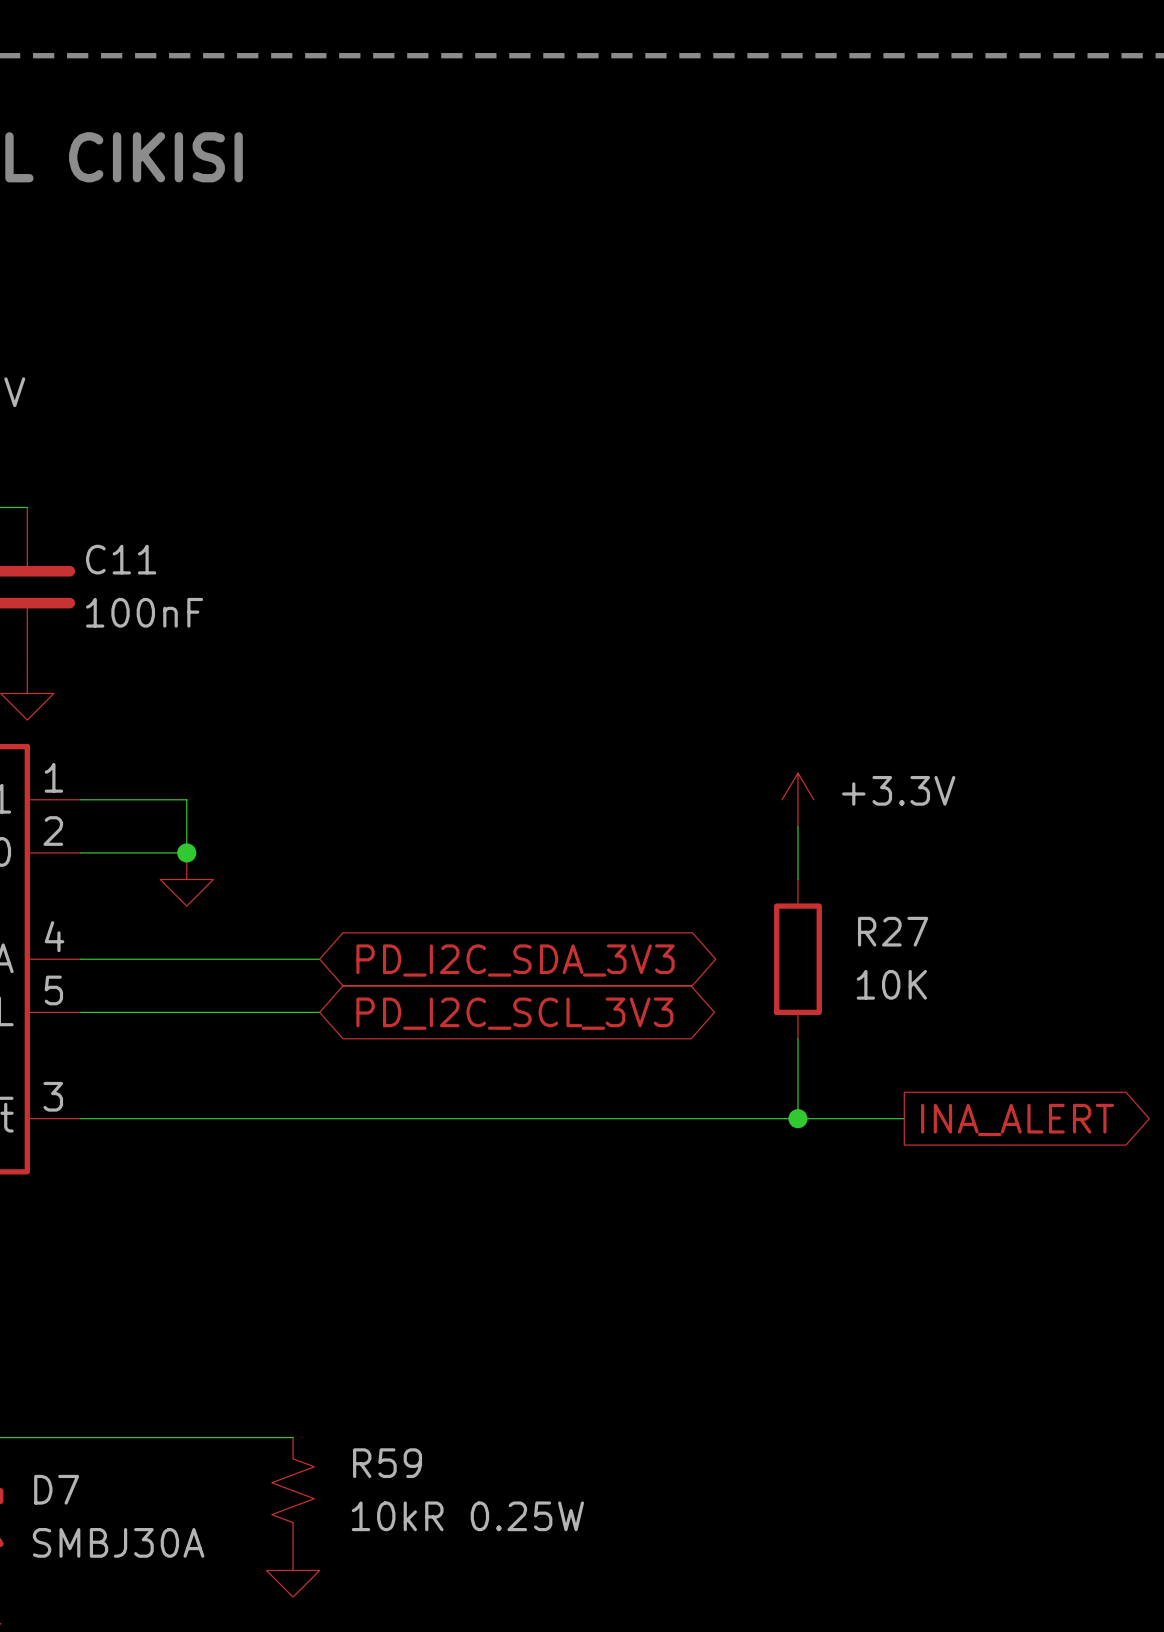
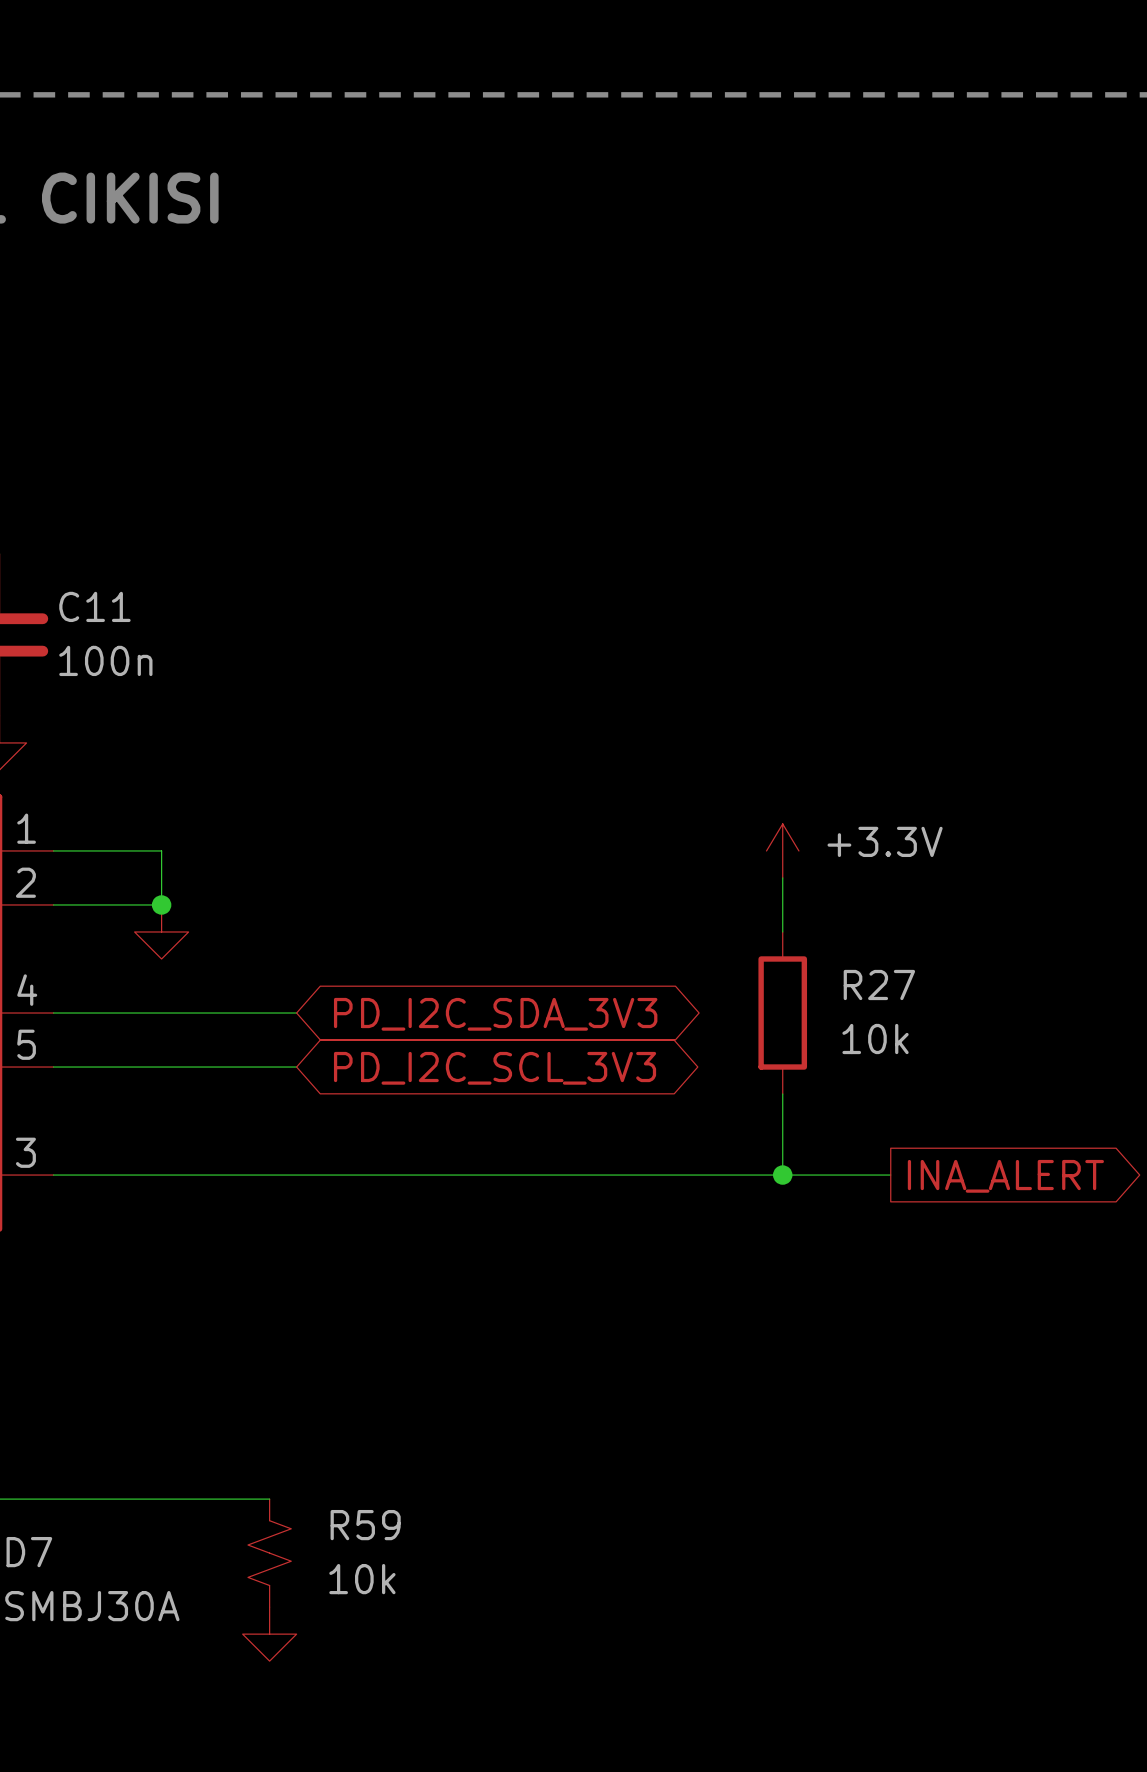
C11 value: 100nF (144, 612) -> 100n (105, 660)
R27 value: 10K (891, 984) -> 10k (875, 1039)
R59 value: 10kR 0.25W (467, 1516) -> 10k (362, 1579)

